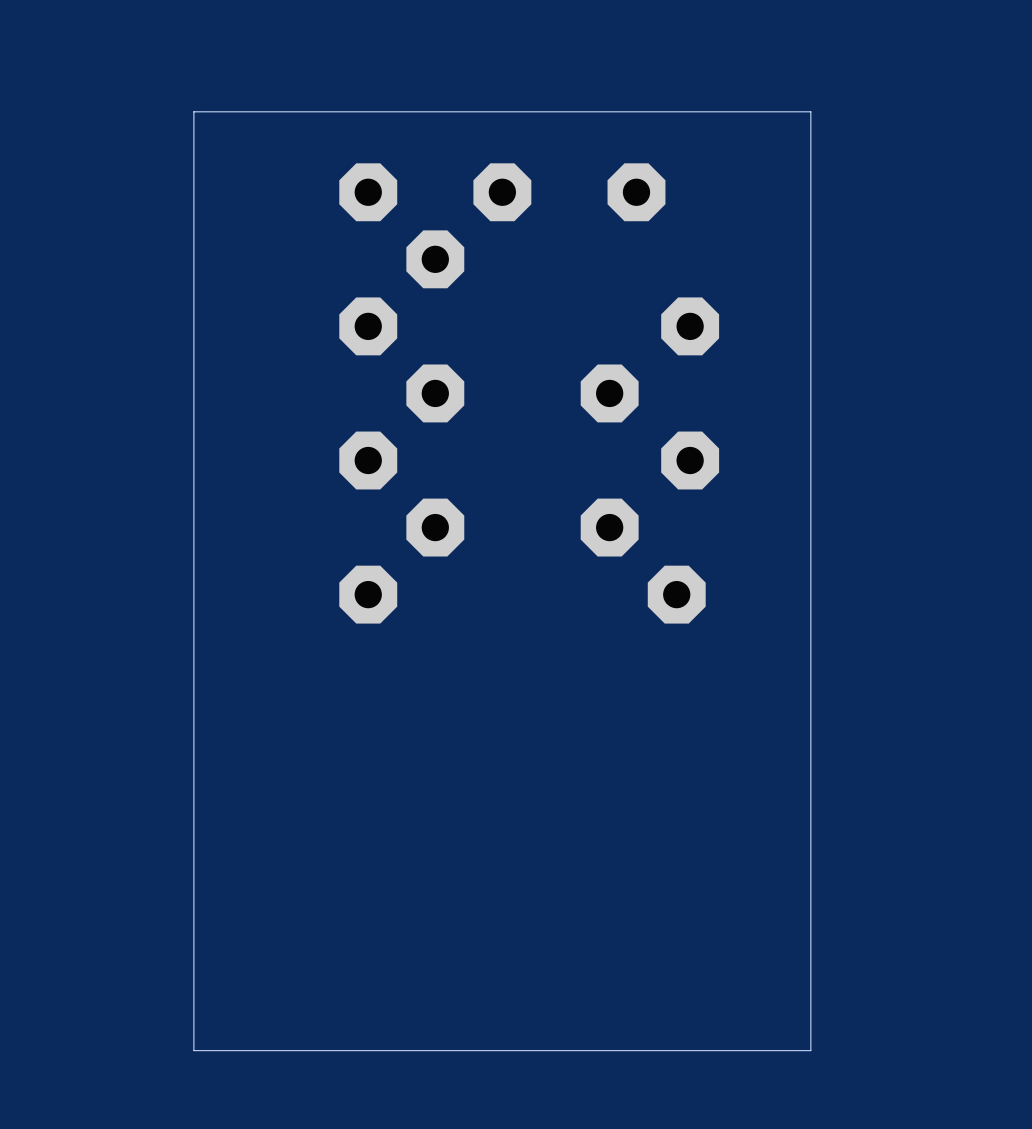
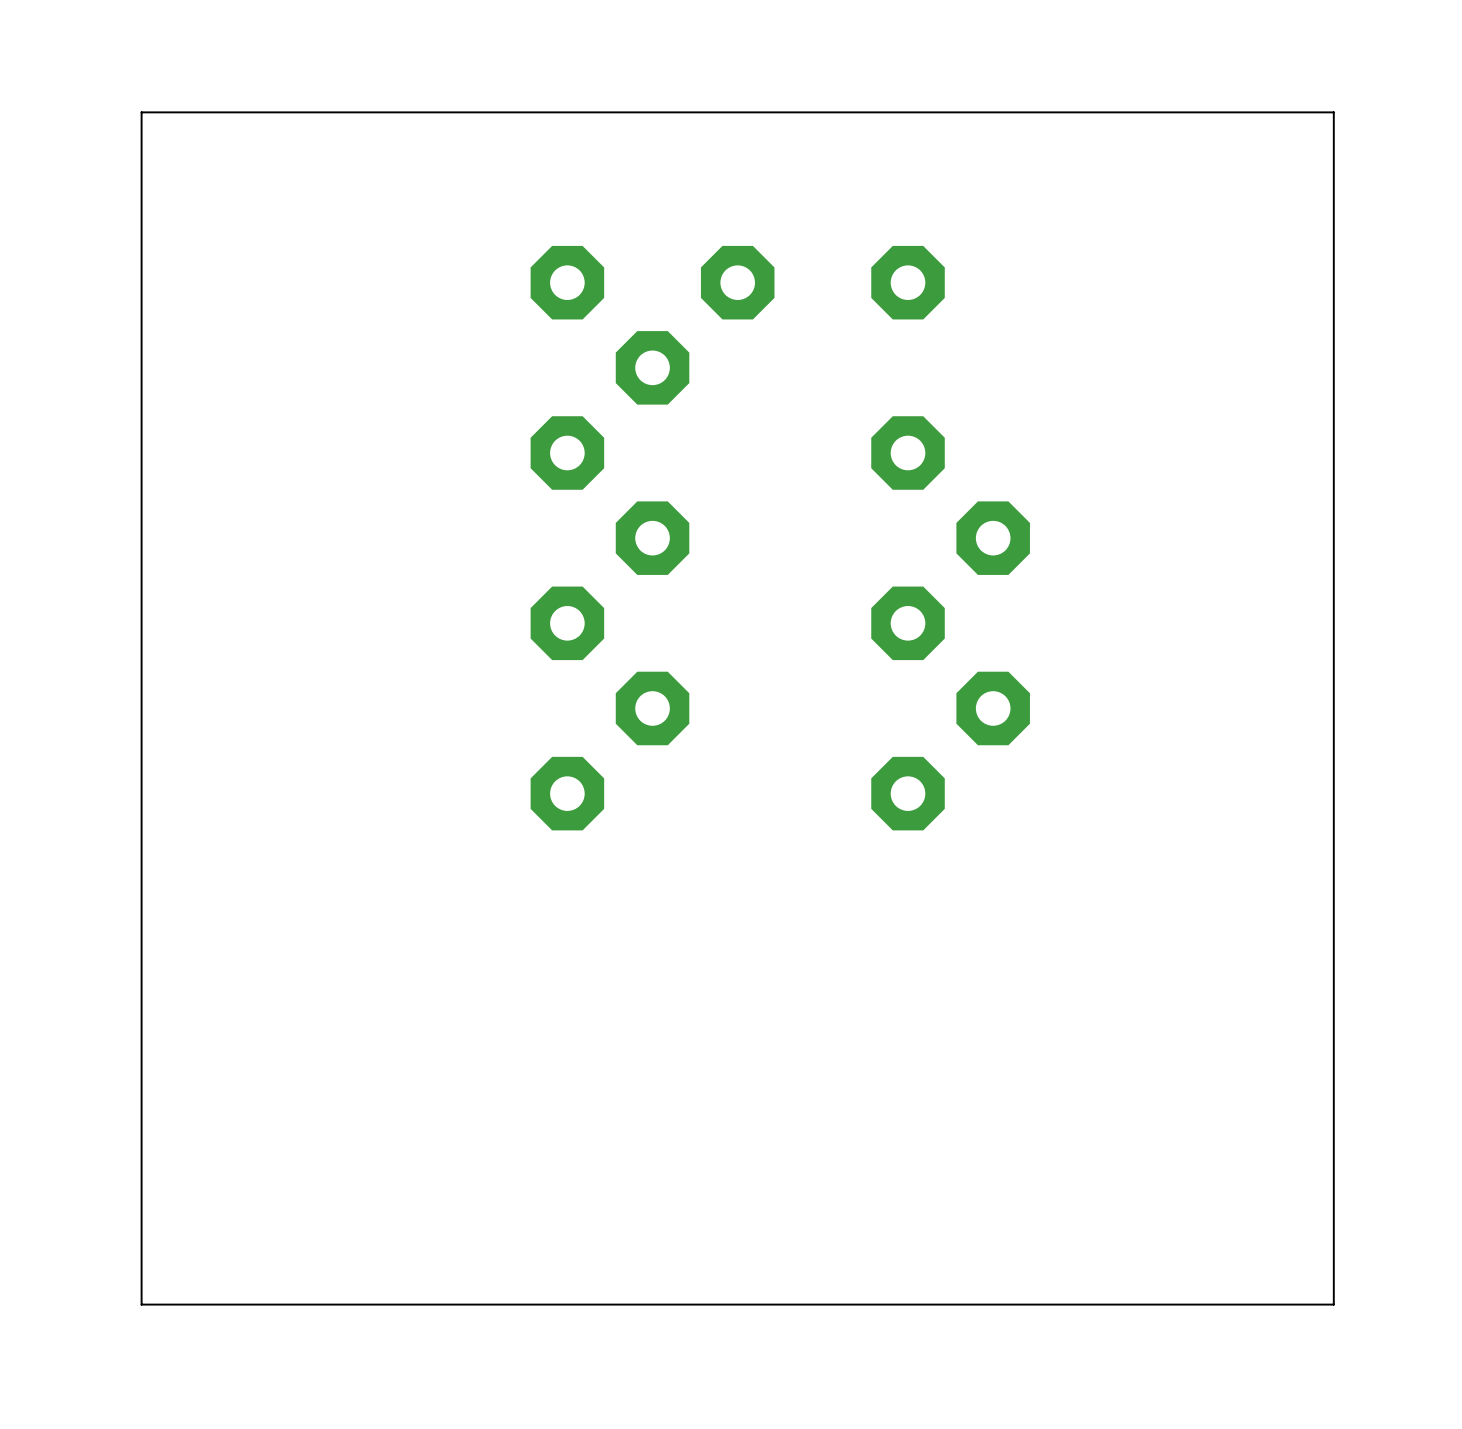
board edge: (810, 111) (193, 111) (193, 1050) (810, 1050) (810, 111) -> (1333, 112) (1333, 1304) (141, 1304) (141, 112) (1333, 112)
part: none -> (908, 453)
part: (690, 326) -> none
part: (609, 393) -> none
part: none -> (993, 538)
part: none -> (908, 623)
part: (690, 460) -> none
part: (609, 527) -> none
part: none -> (993, 708)
part: none -> (908, 793)
part: (676, 594) -> none

